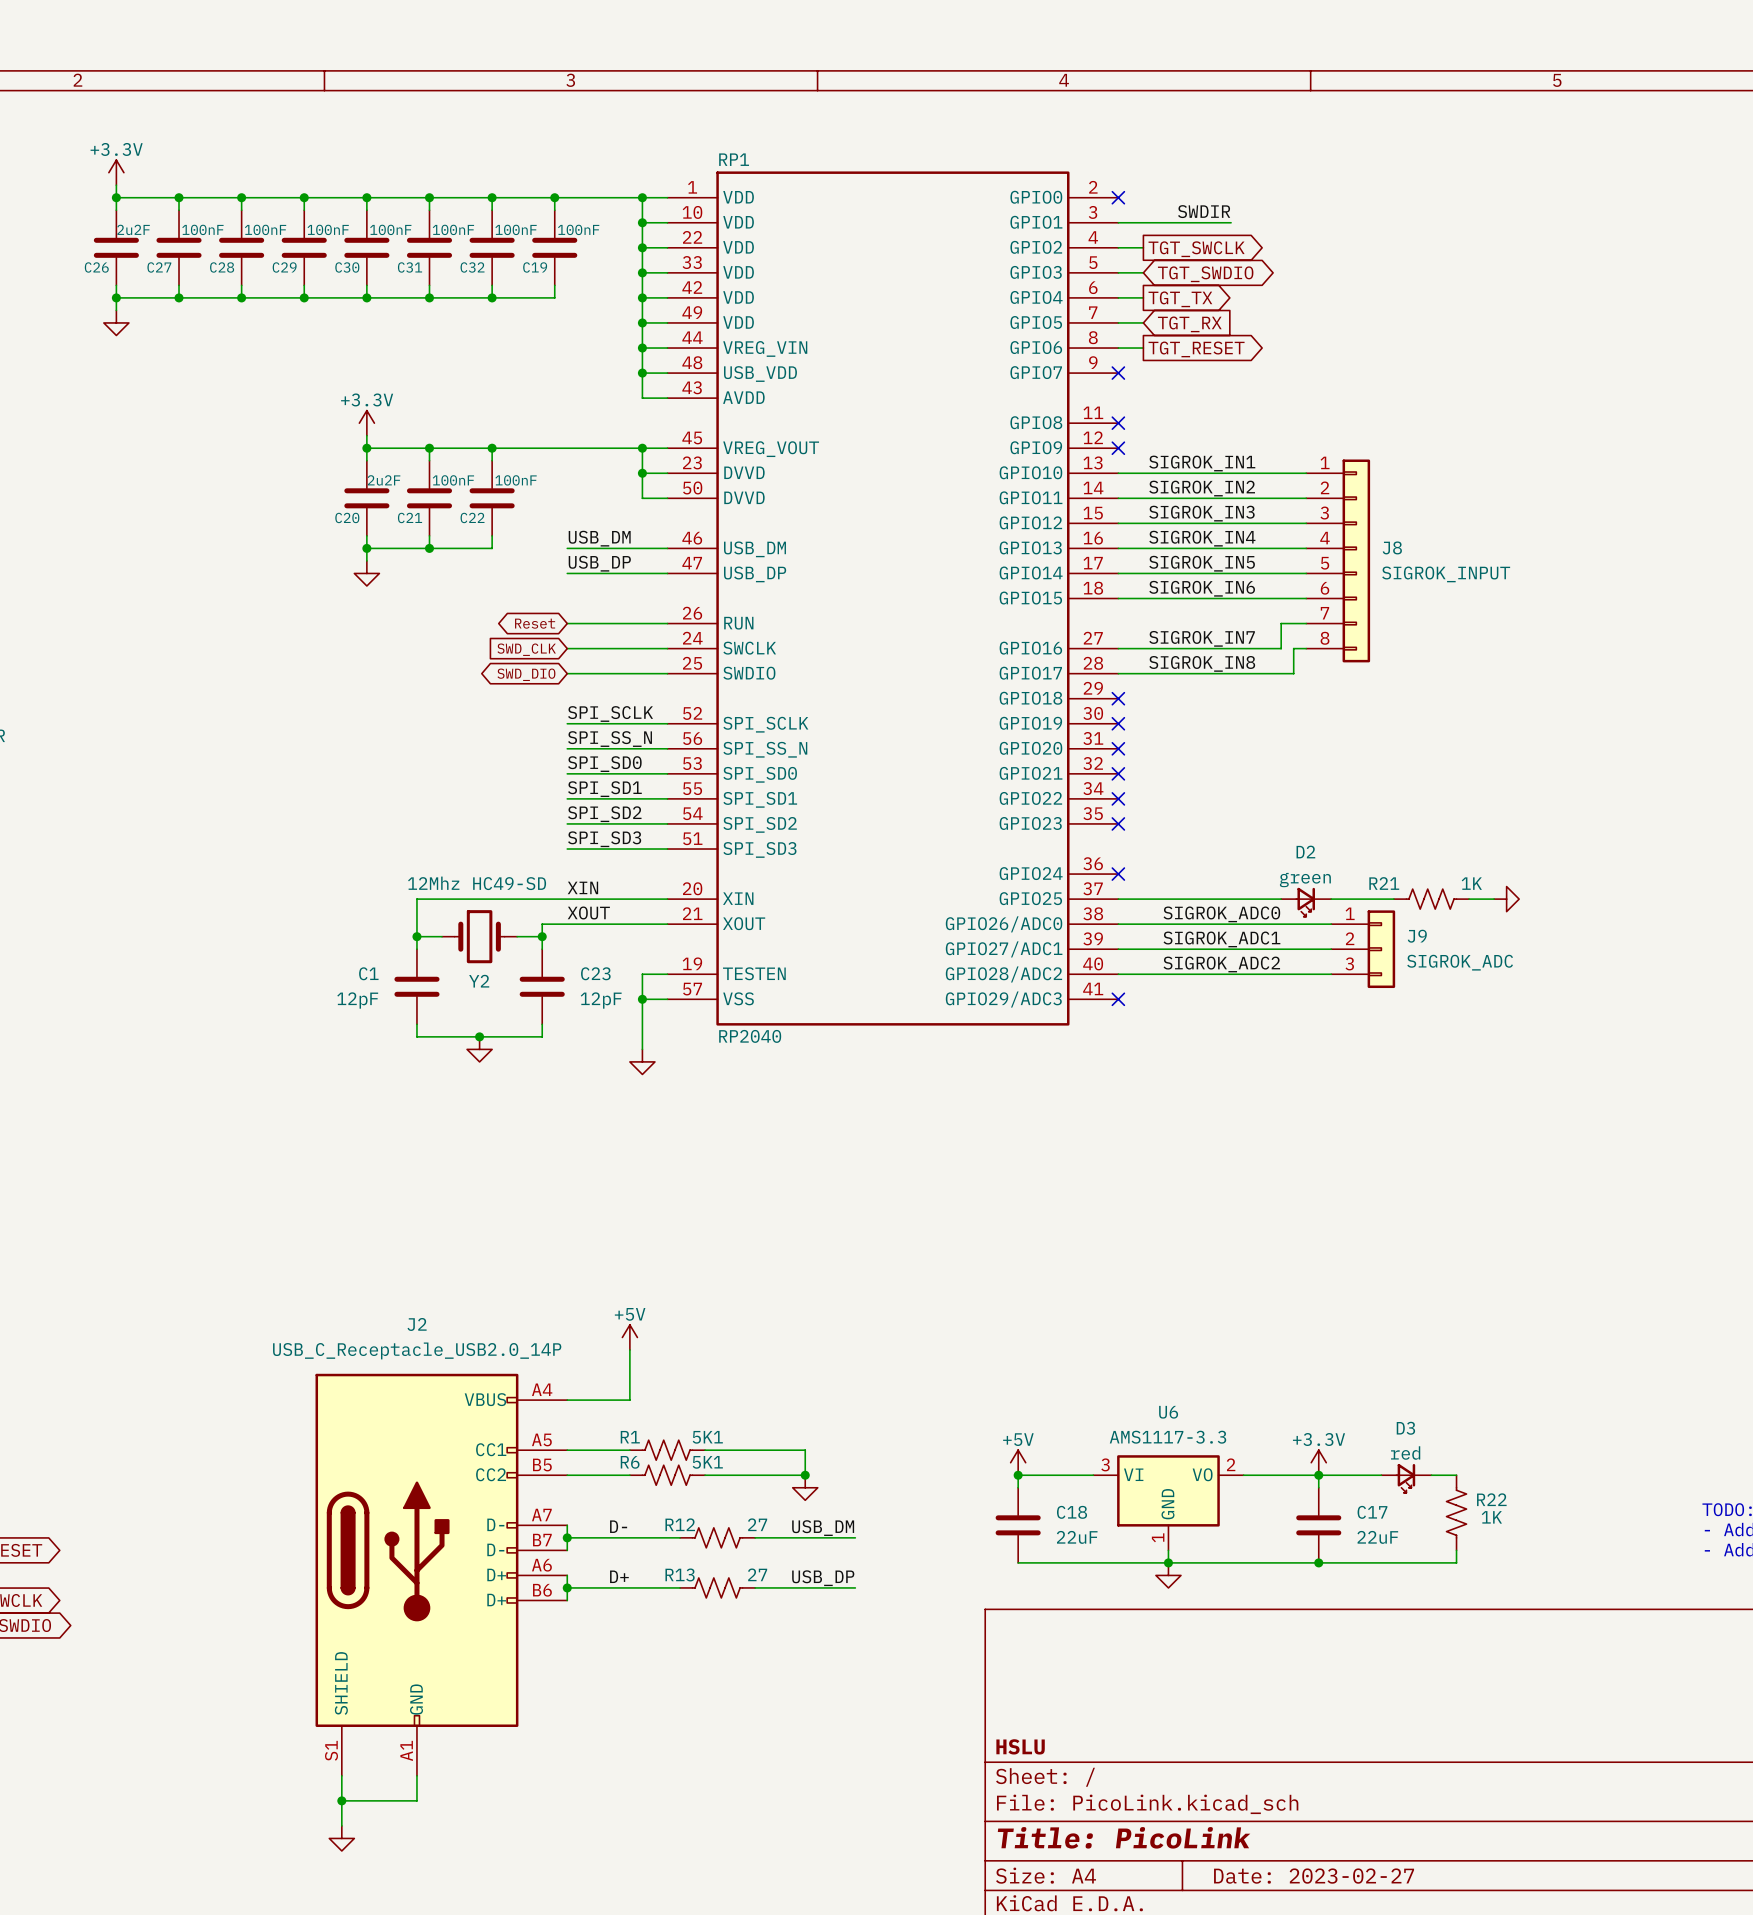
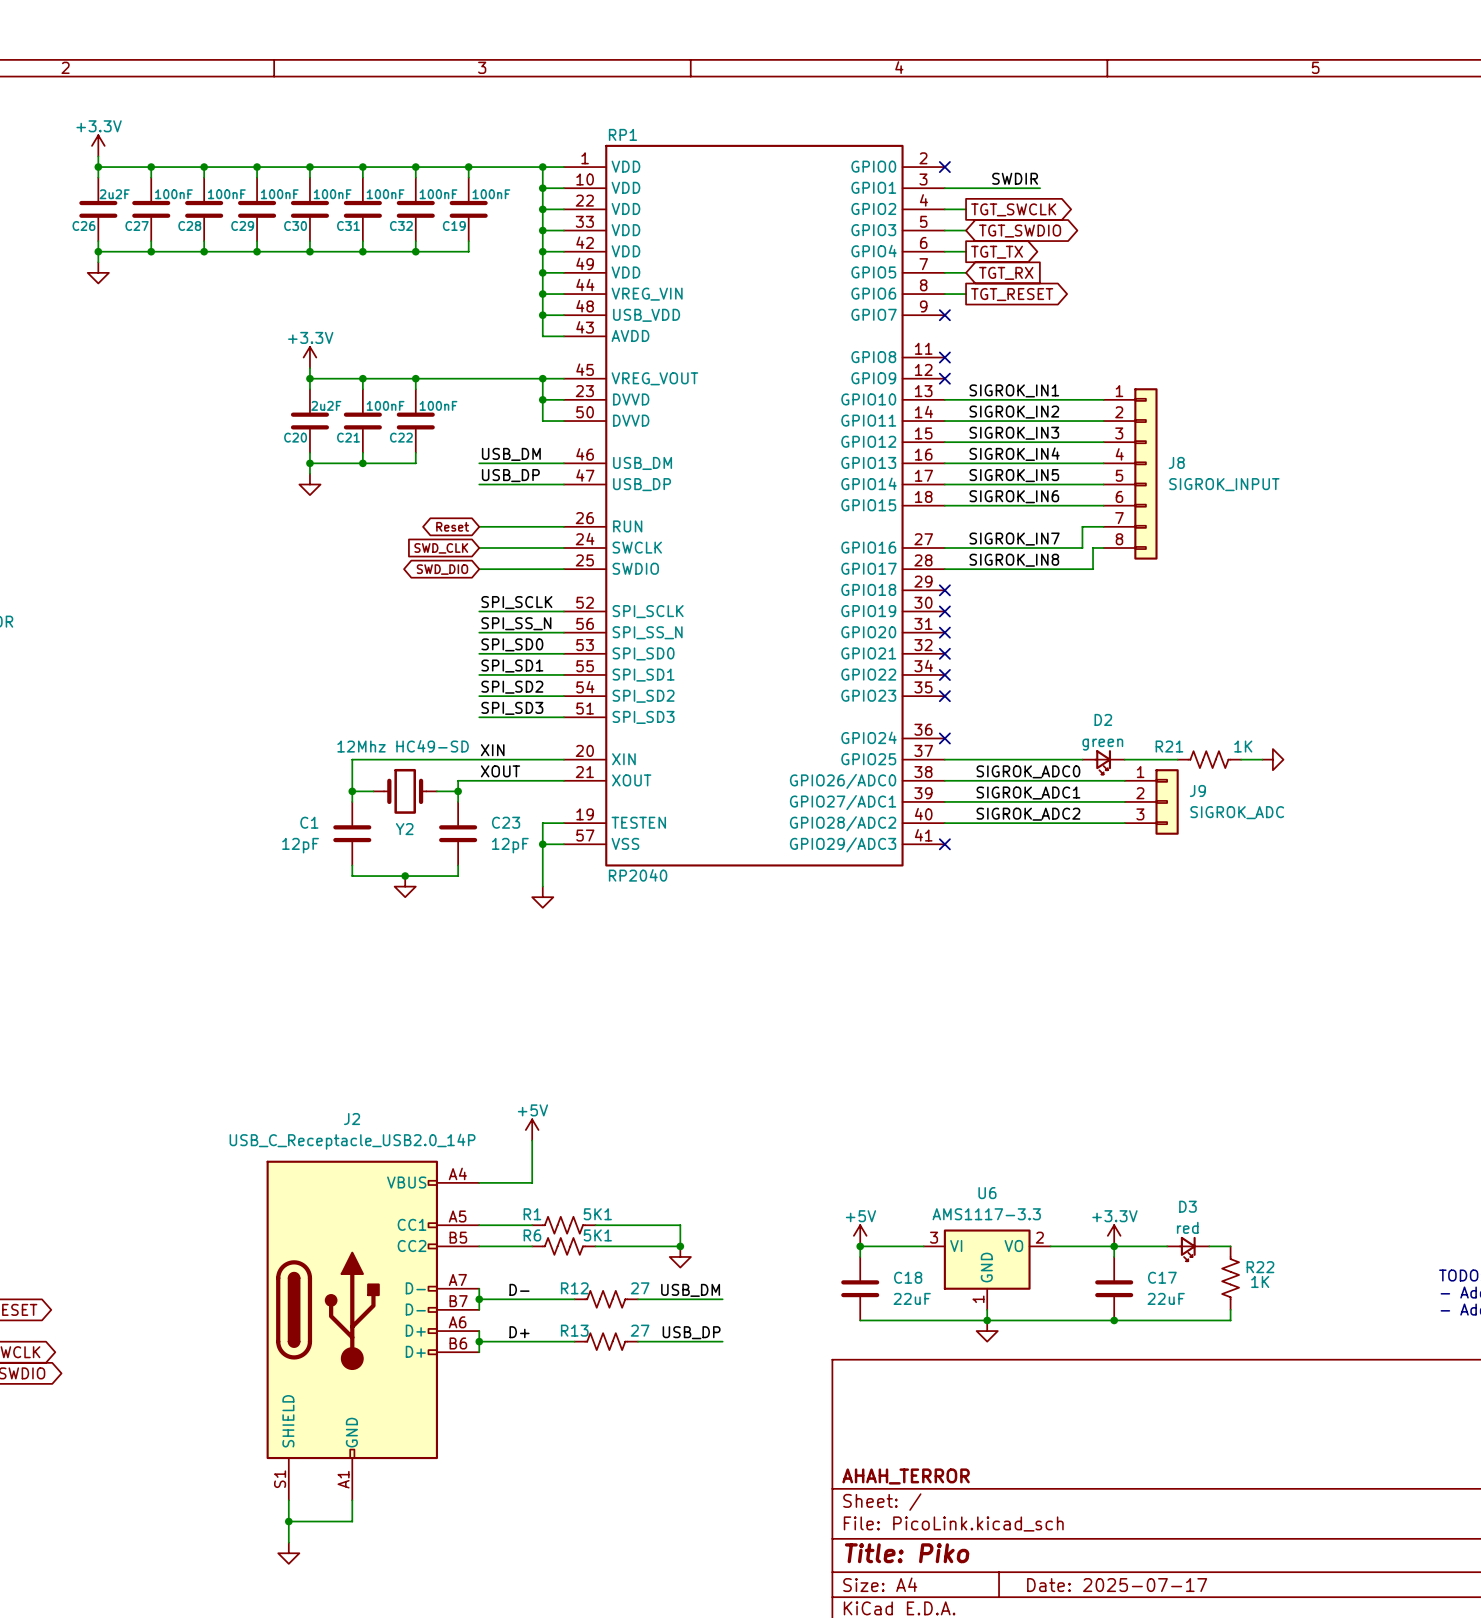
title block: HSLU (1020, 1746) -> AHAH_TERROR (906, 1476)
title block: Title: PicoLink (1124, 1837) -> Title: Piko (907, 1553)
title block: Date: 2023-02-27 (1314, 1876) -> Date: 2025-07-17 (1117, 1585)

